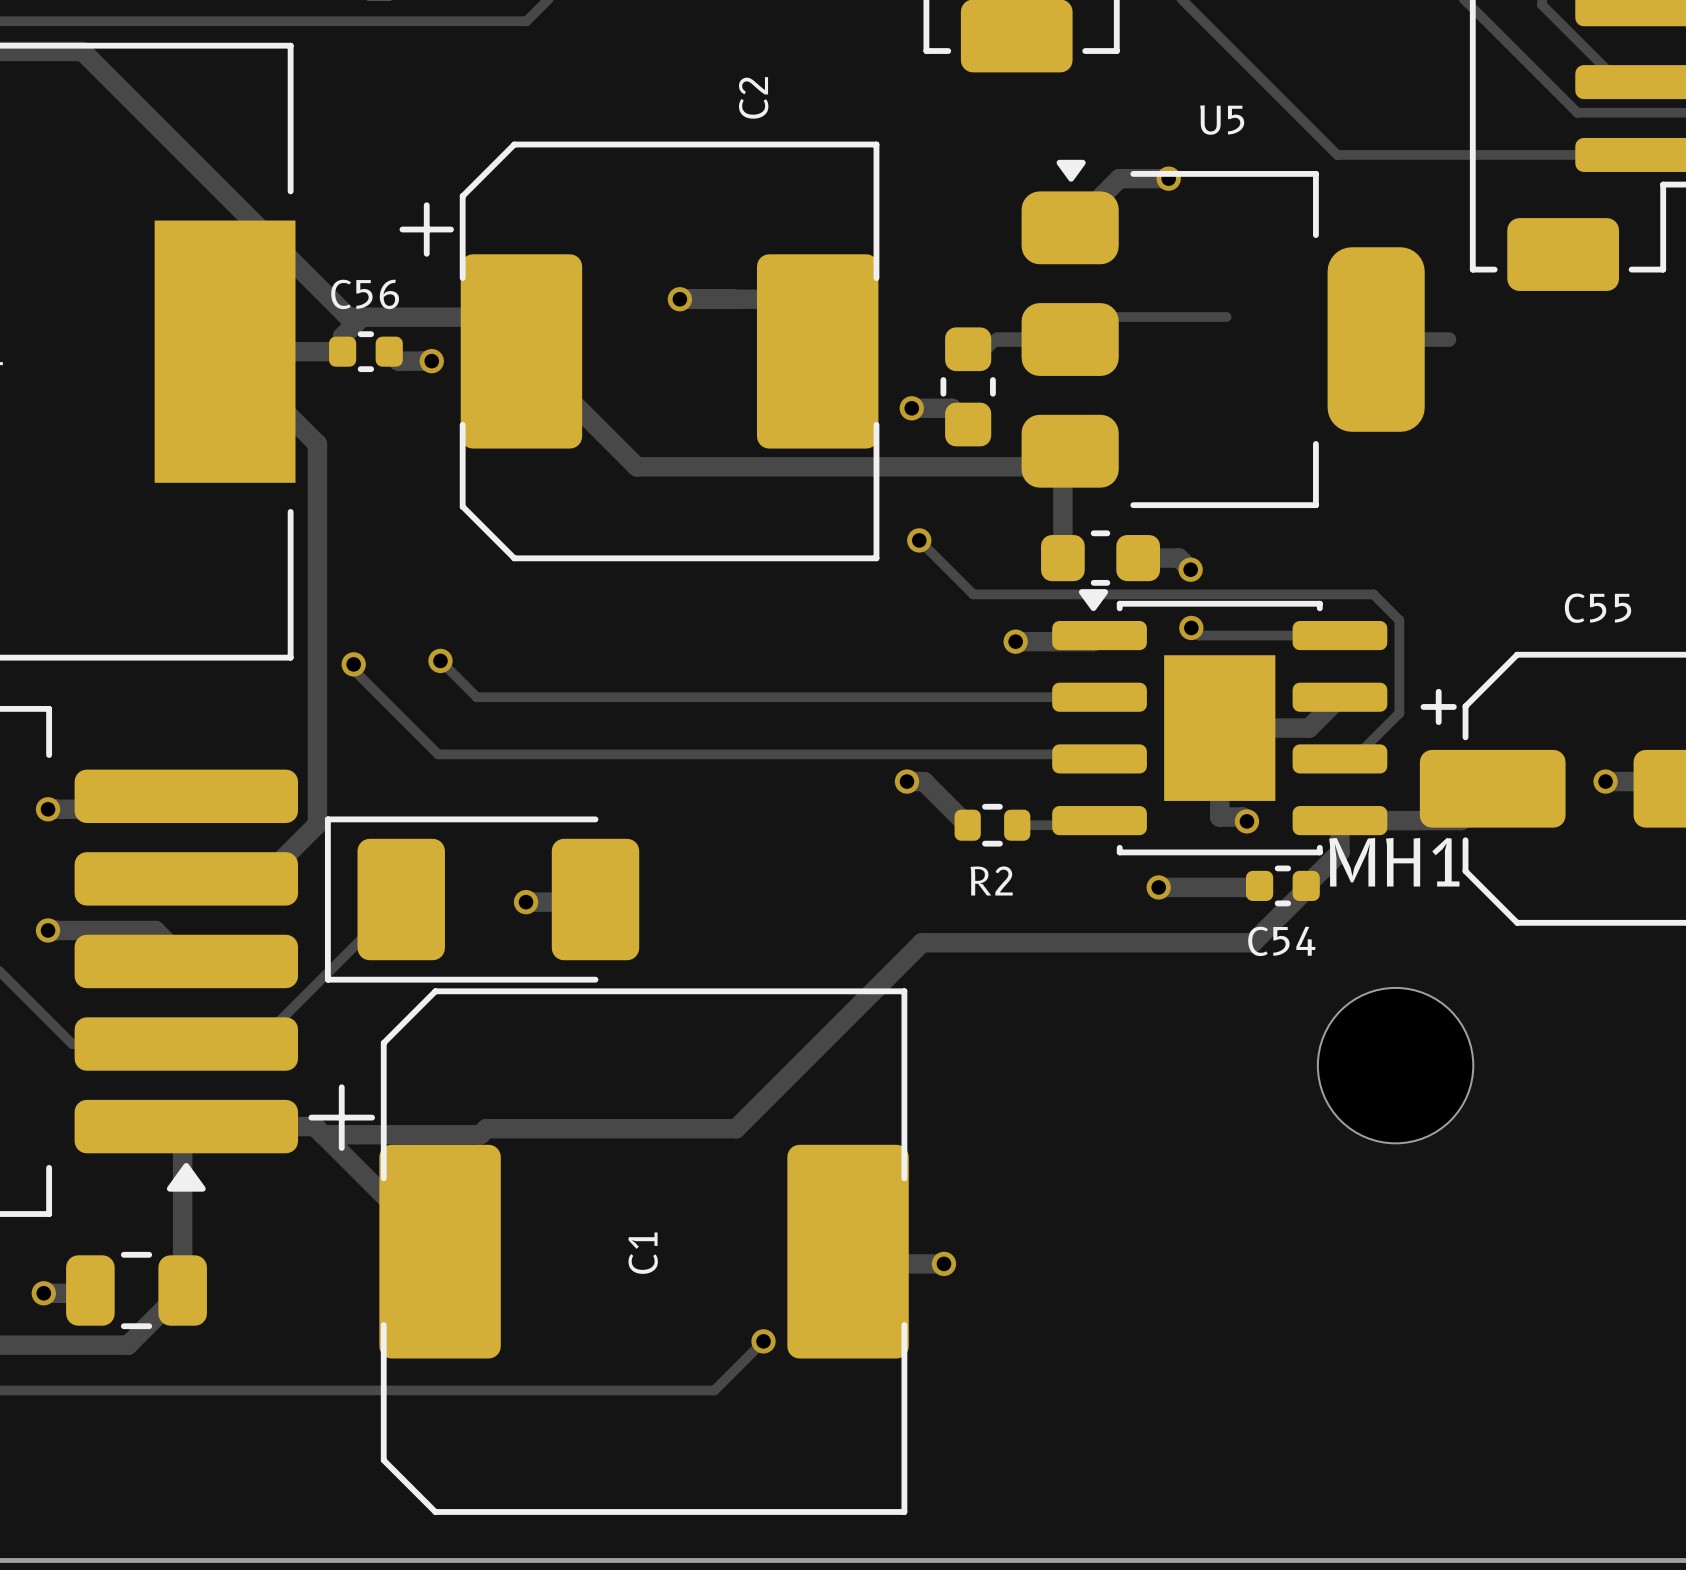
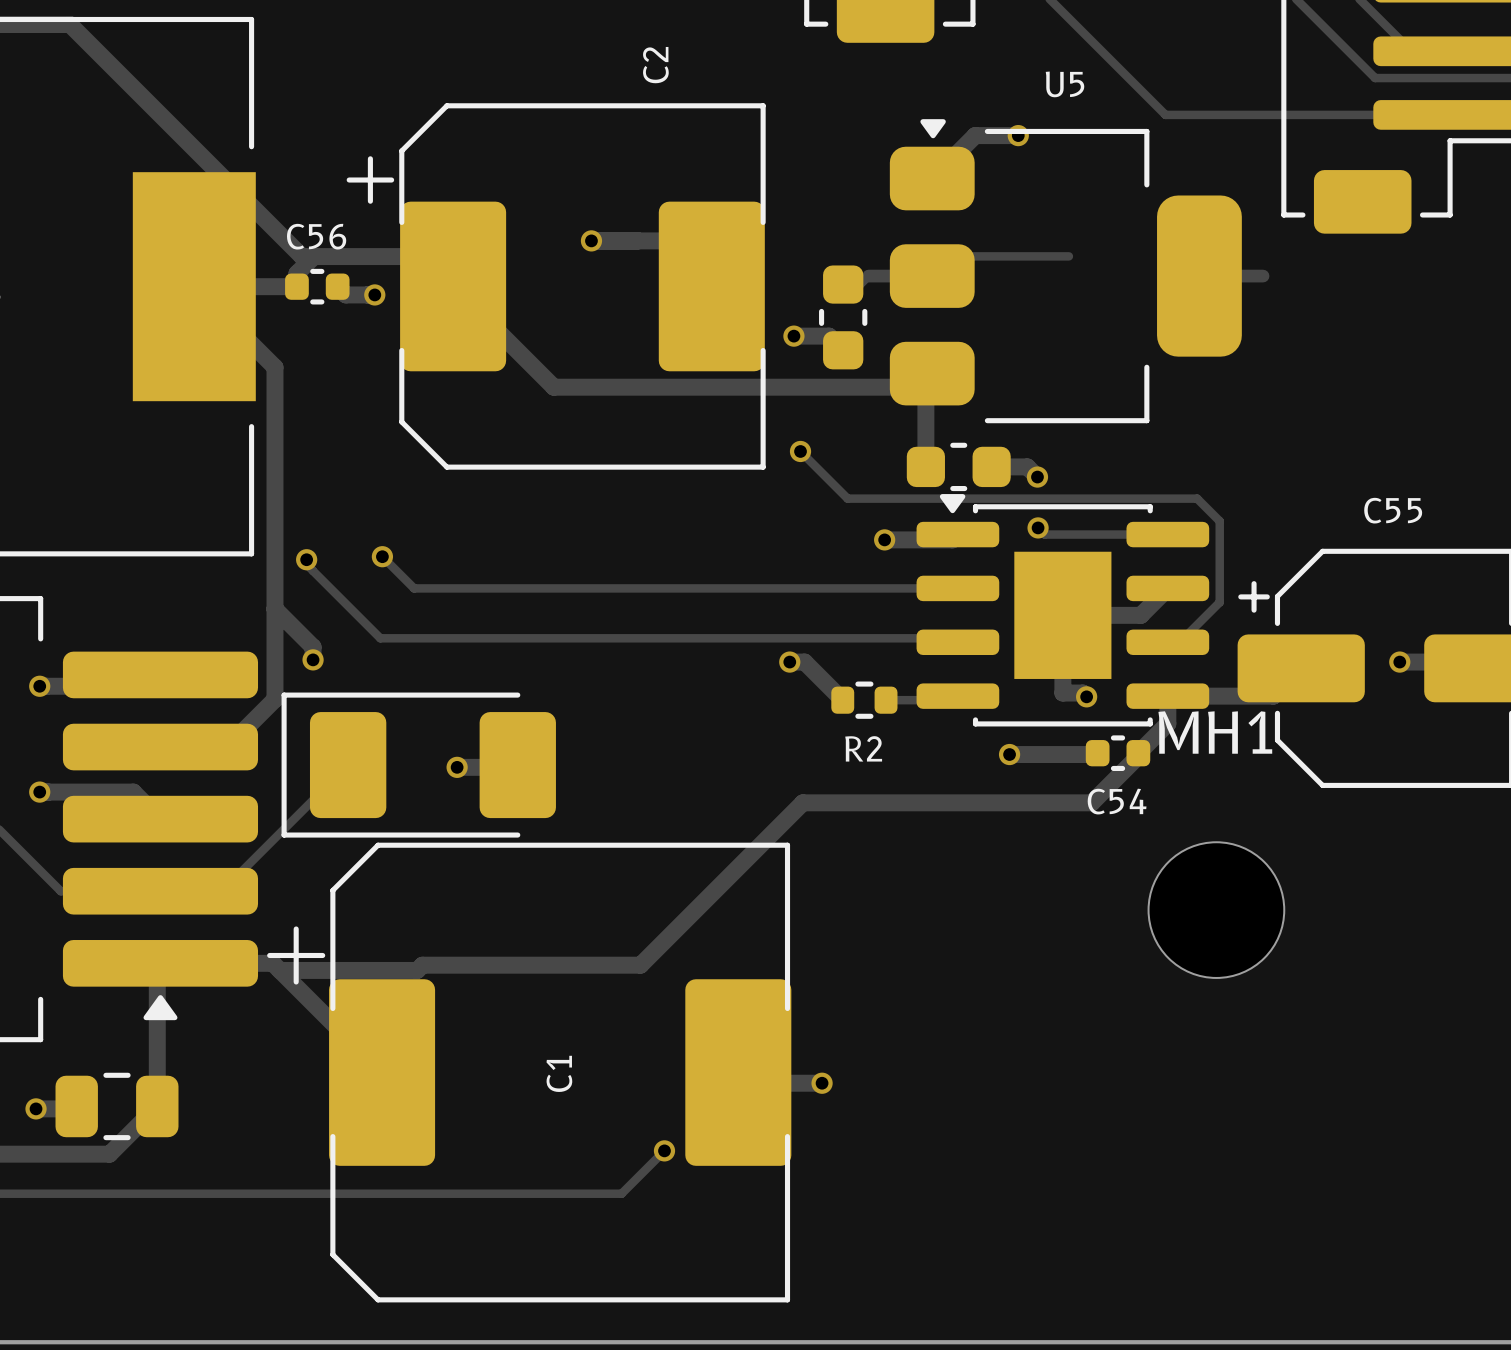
track: none -> (274, 608) (313, 647) (313, 659)
via: none -> (313, 659)

